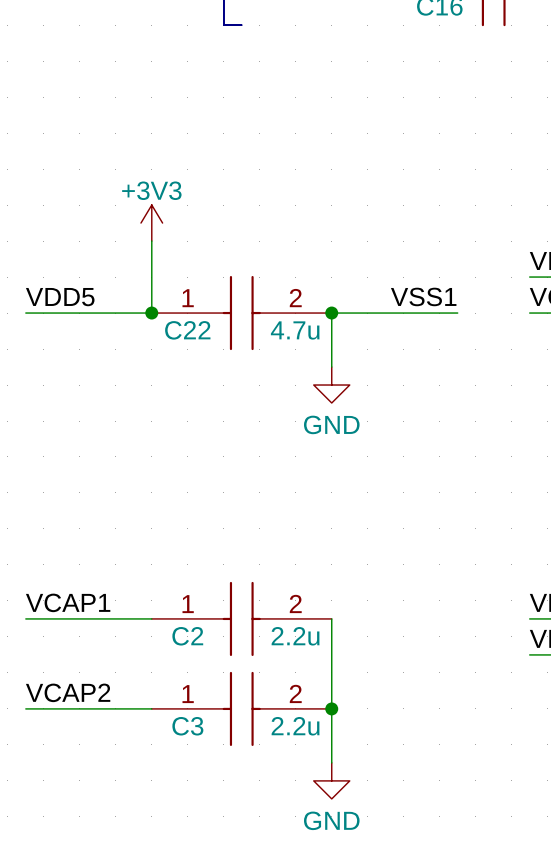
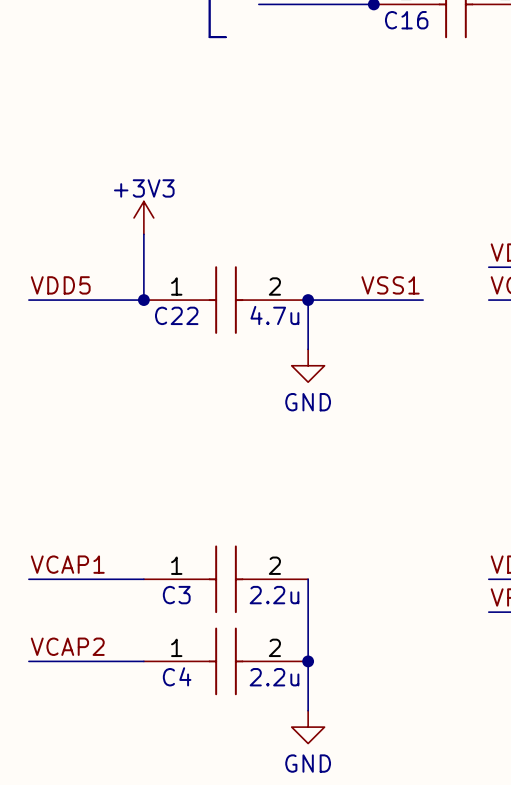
C2 name: C2 (187, 636) -> C3 (176, 595)
C3 name: C3 (187, 726) -> C4 (177, 676)

